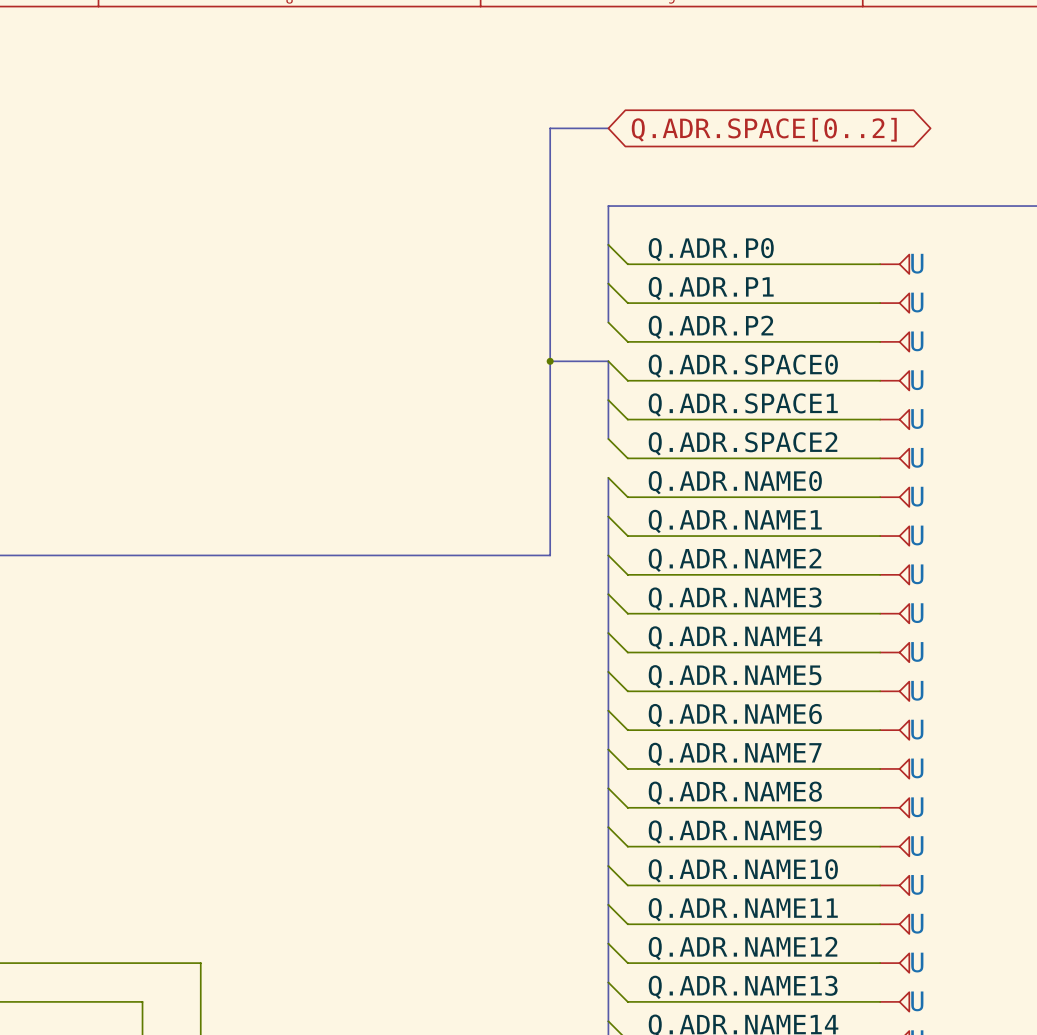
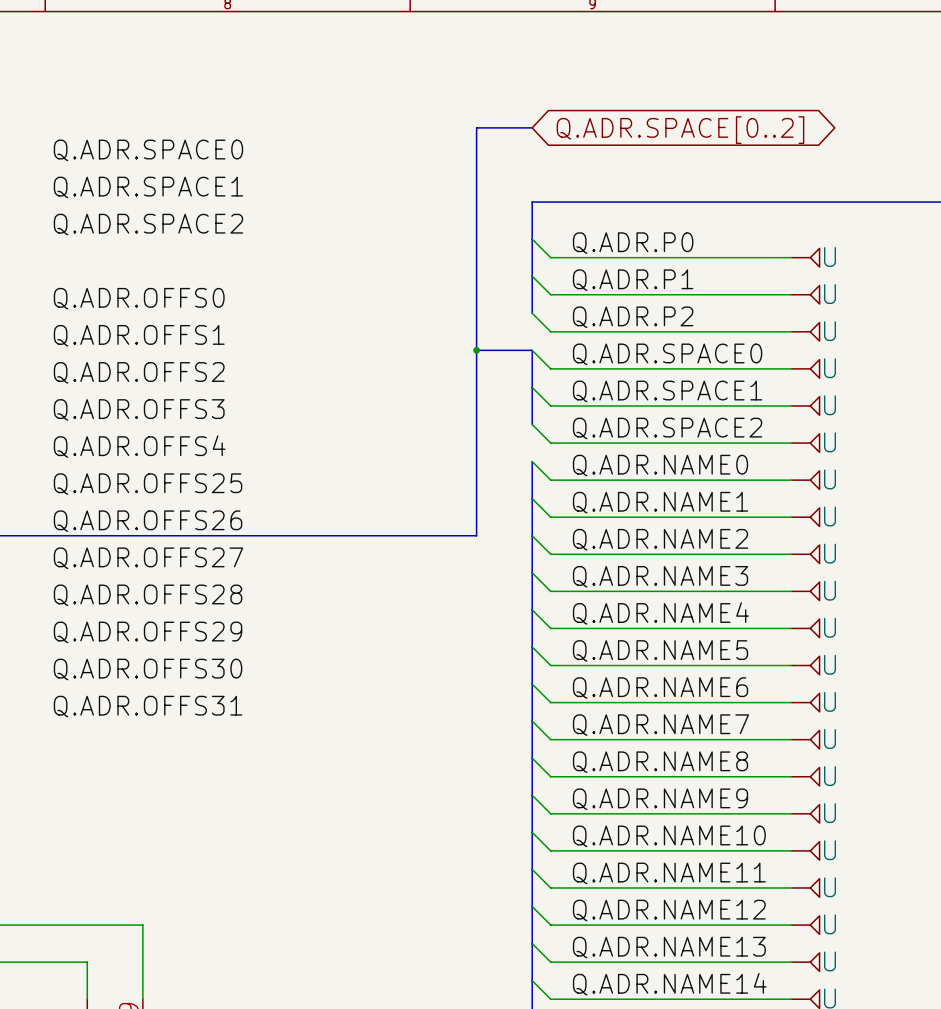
label: none -> Q.ADR.SPACE0 (148, 150)
label: none -> Q.ADR.SPACE1 (148, 187)
label: none -> Q.ADR.SPACE2 (148, 224)
label: none -> Q.ADR.OFFS0 (139, 298)
label: none -> Q.ADR.OFFS1 (139, 335)
label: none -> Q.ADR.OFFS2 (139, 372)
label: none -> Q.ADR.OFFS3 (139, 409)
label: none -> Q.ADR.OFFS4 (139, 446)
label: none -> Q.ADR.OFFS25 (148, 484)
label: none -> Q.ADR.OFFS26 (148, 521)
label: none -> Q.ADR.OFFS27 (148, 558)
label: none -> Q.ADR.OFFS28 (148, 595)
label: none -> Q.ADR.OFFS29 (148, 632)
label: none -> Q.ADR.OFFS30 (148, 669)
label: none -> Q.ADR.OFFS31 (148, 706)

